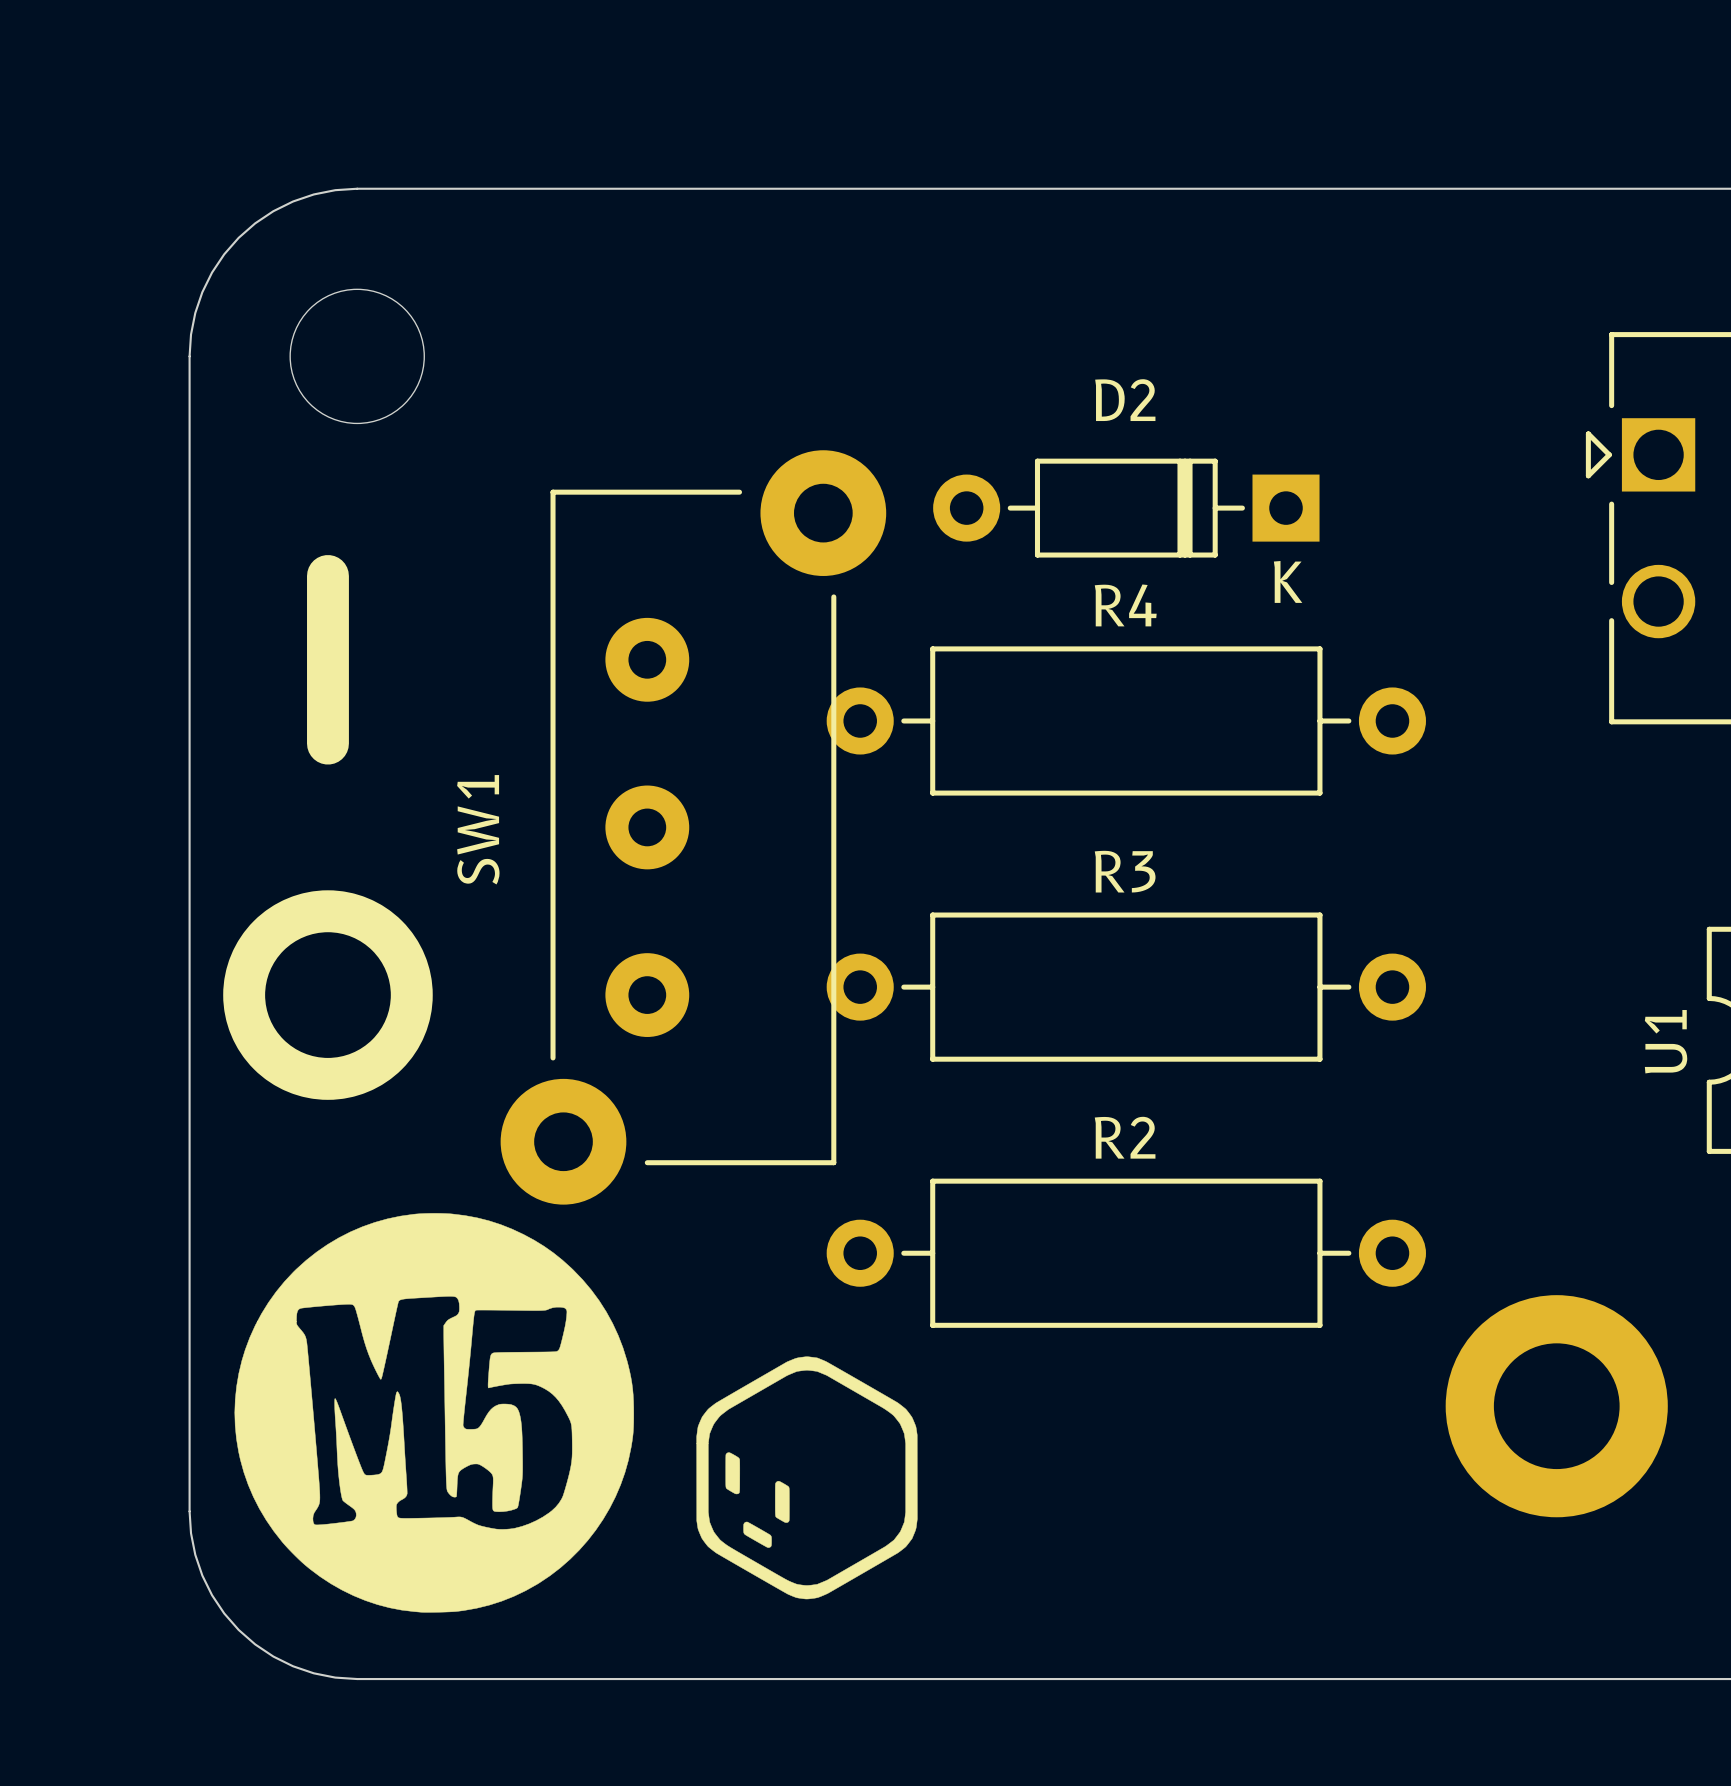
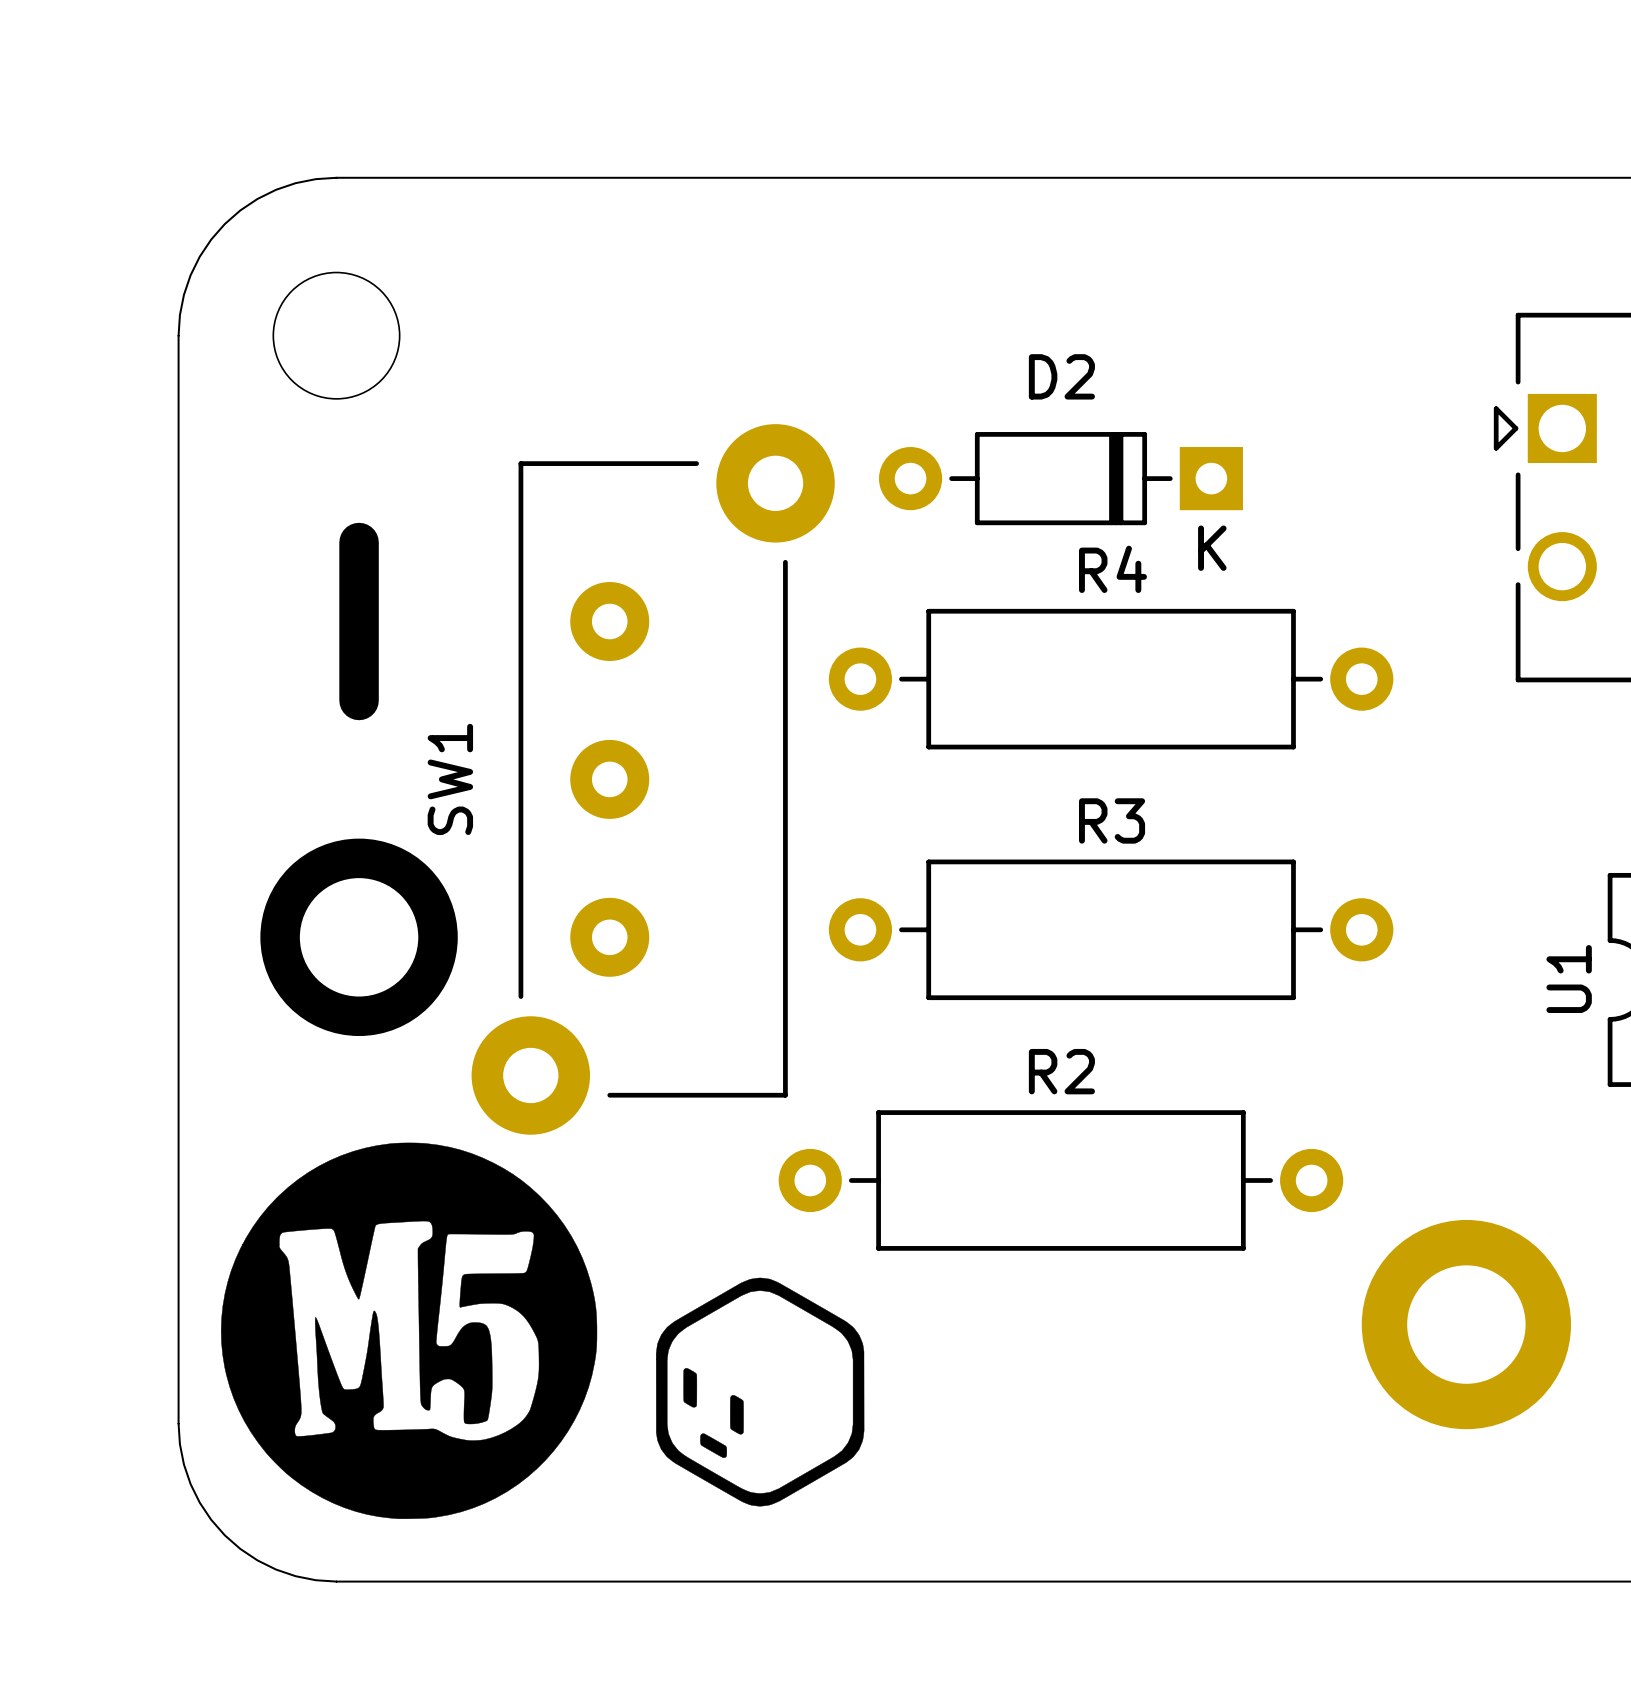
R4 position: (1126, 720) -> (1111, 679)
drawing position: (327, 827) -> (359, 779)
R3 position: (1126, 987) -> (1111, 929)

